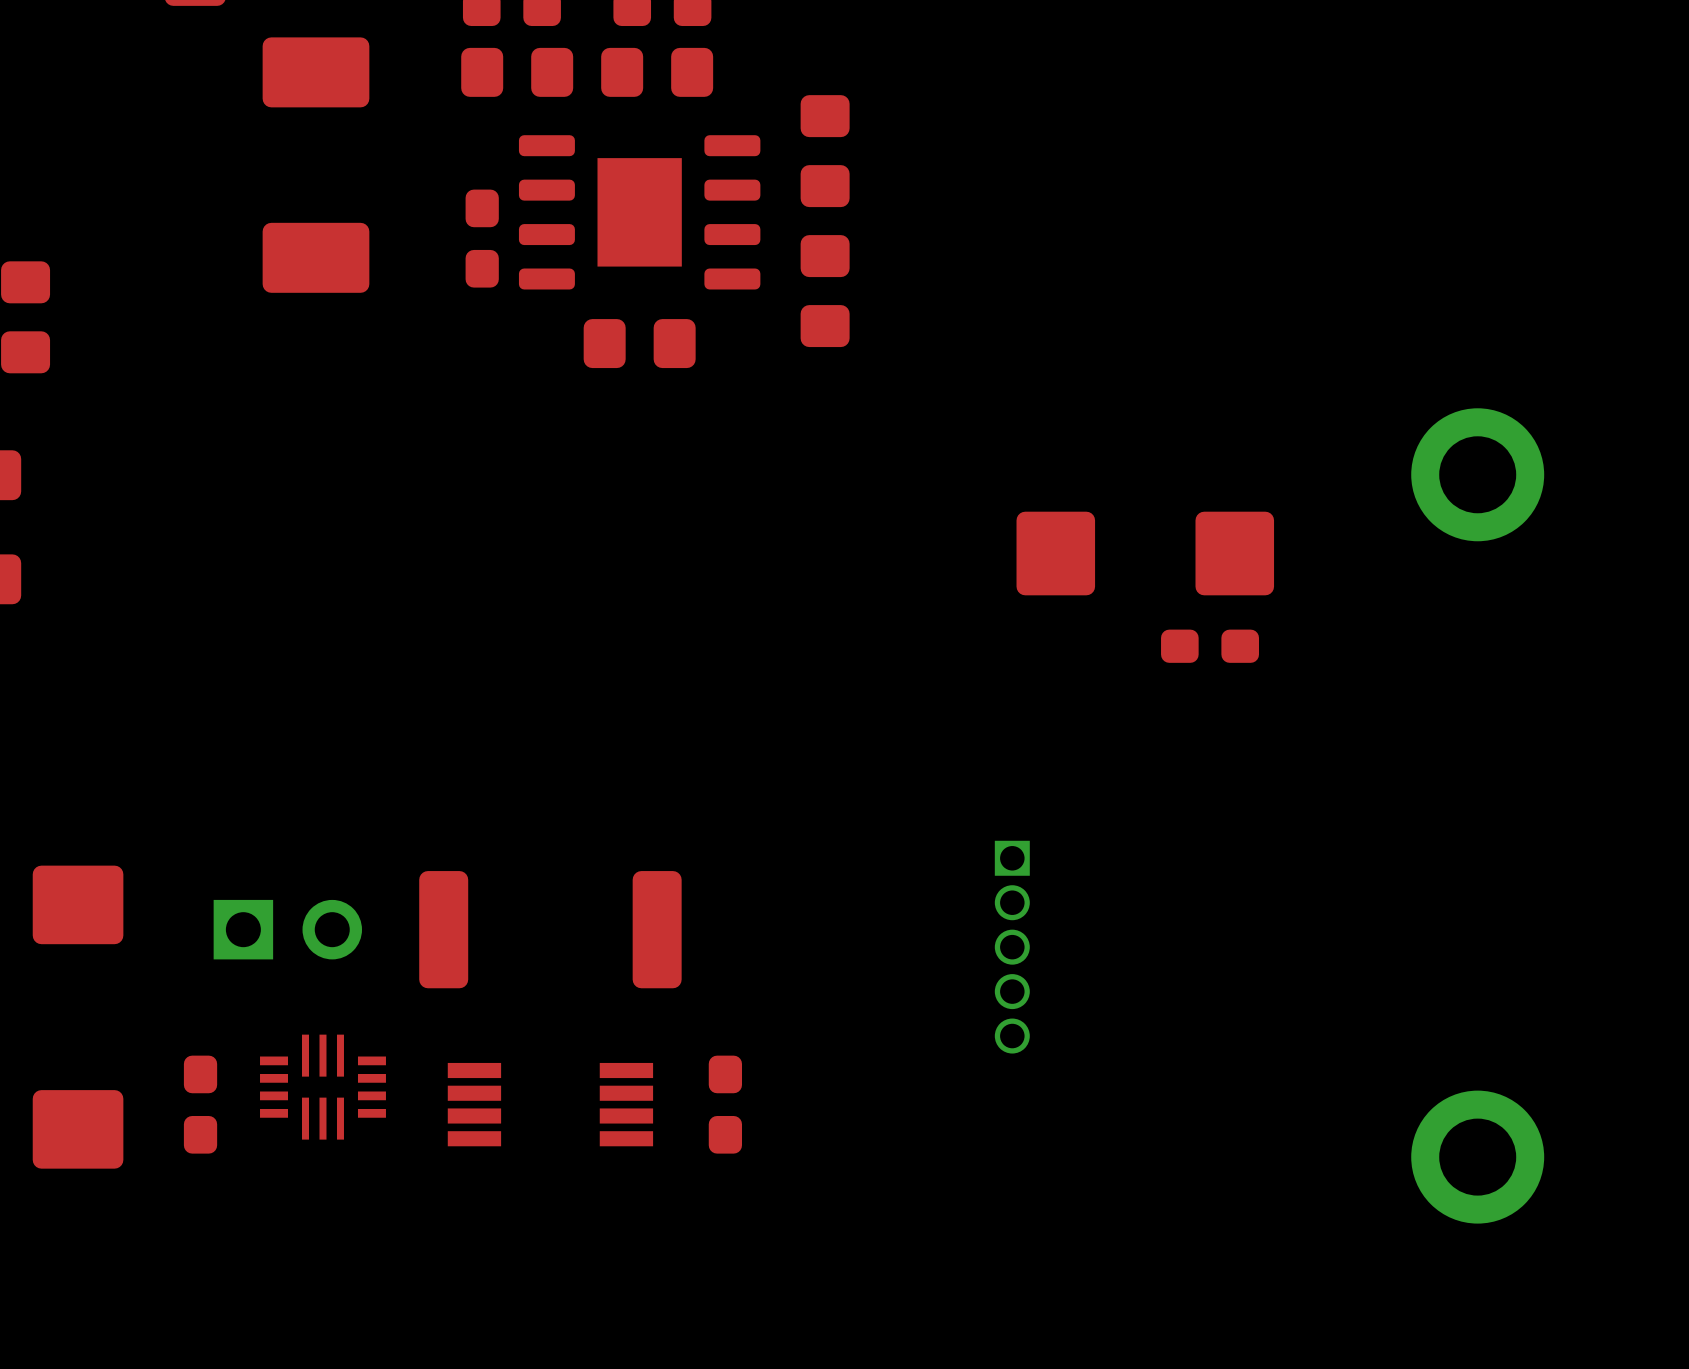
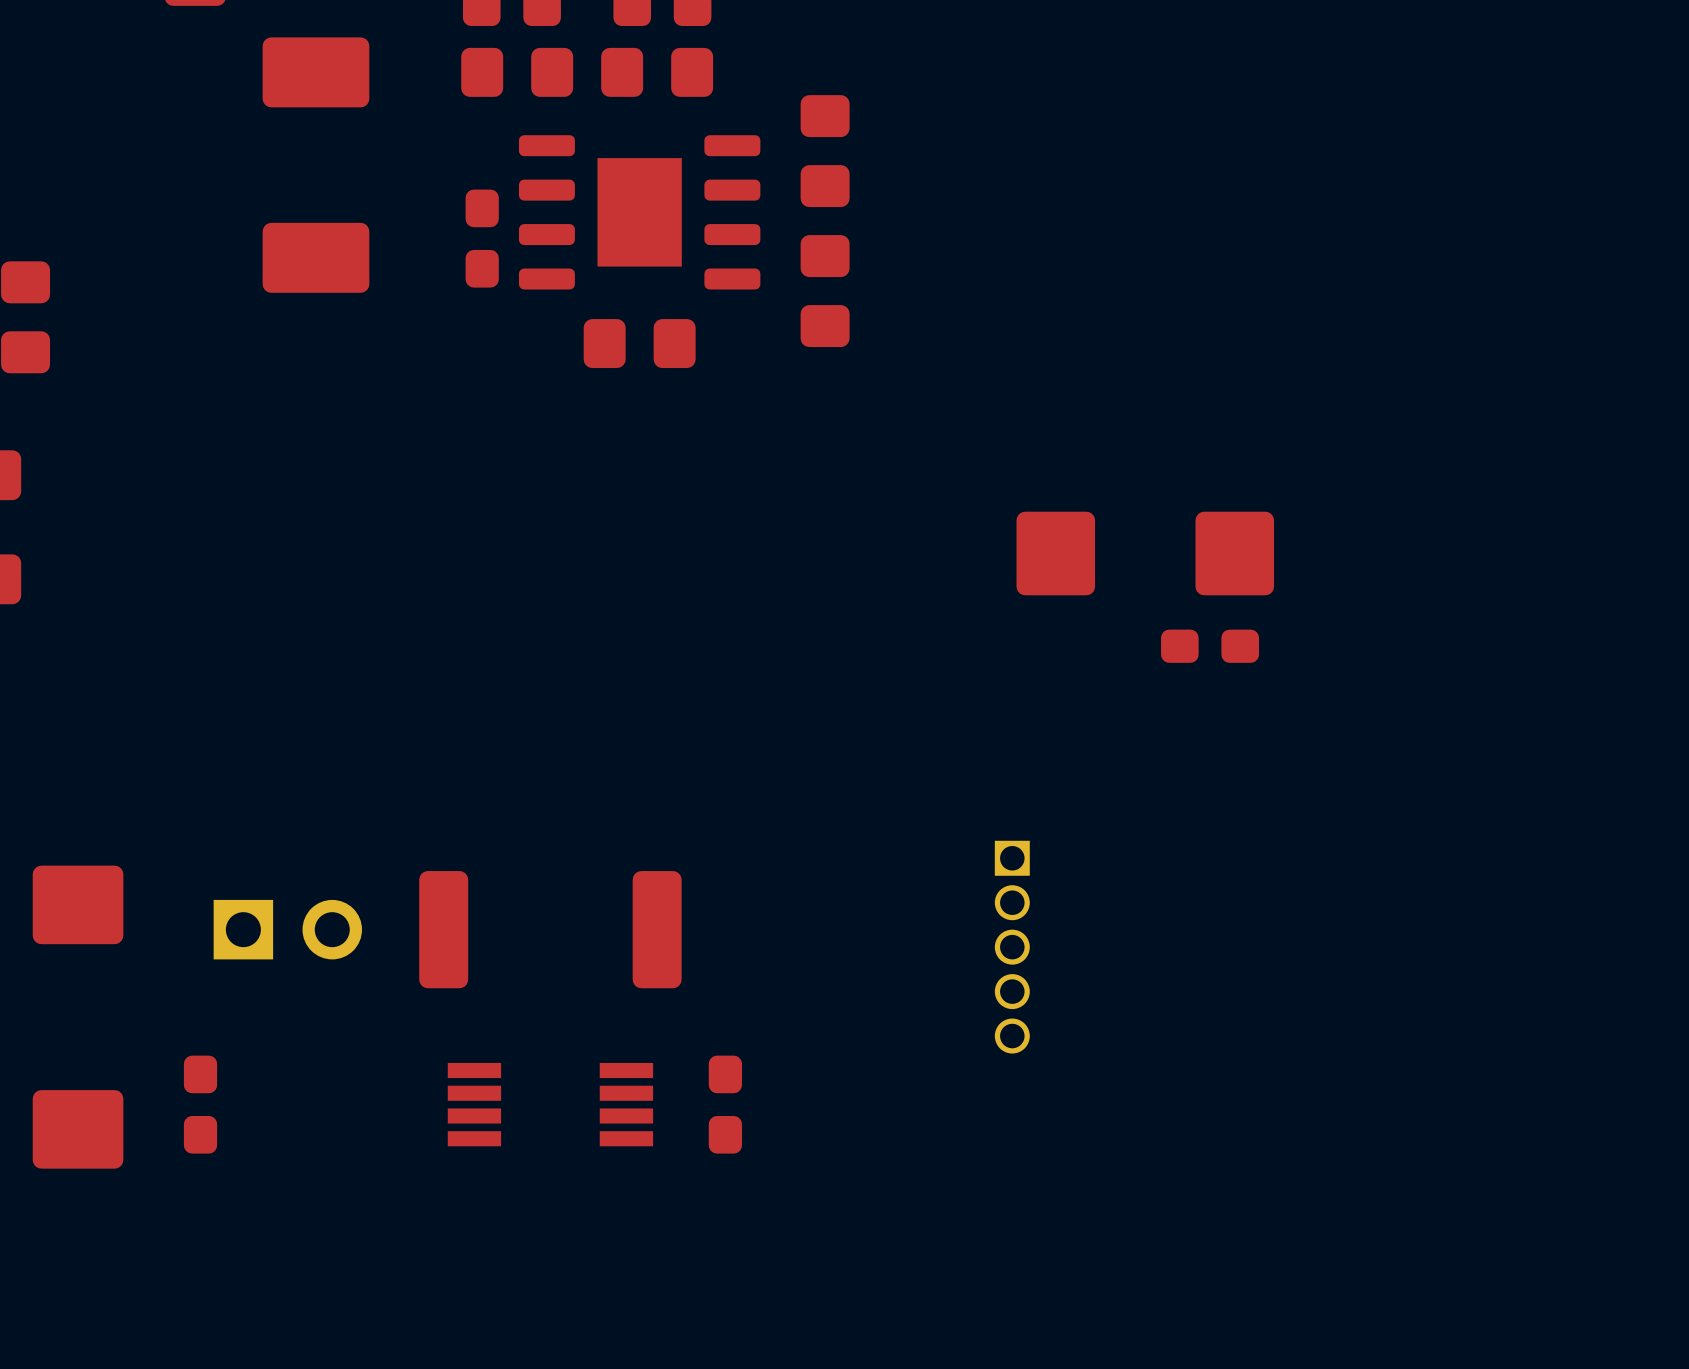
part: (1477, 474) -> none
part: (322, 1087) -> none
part: (1477, 1157) -> none

